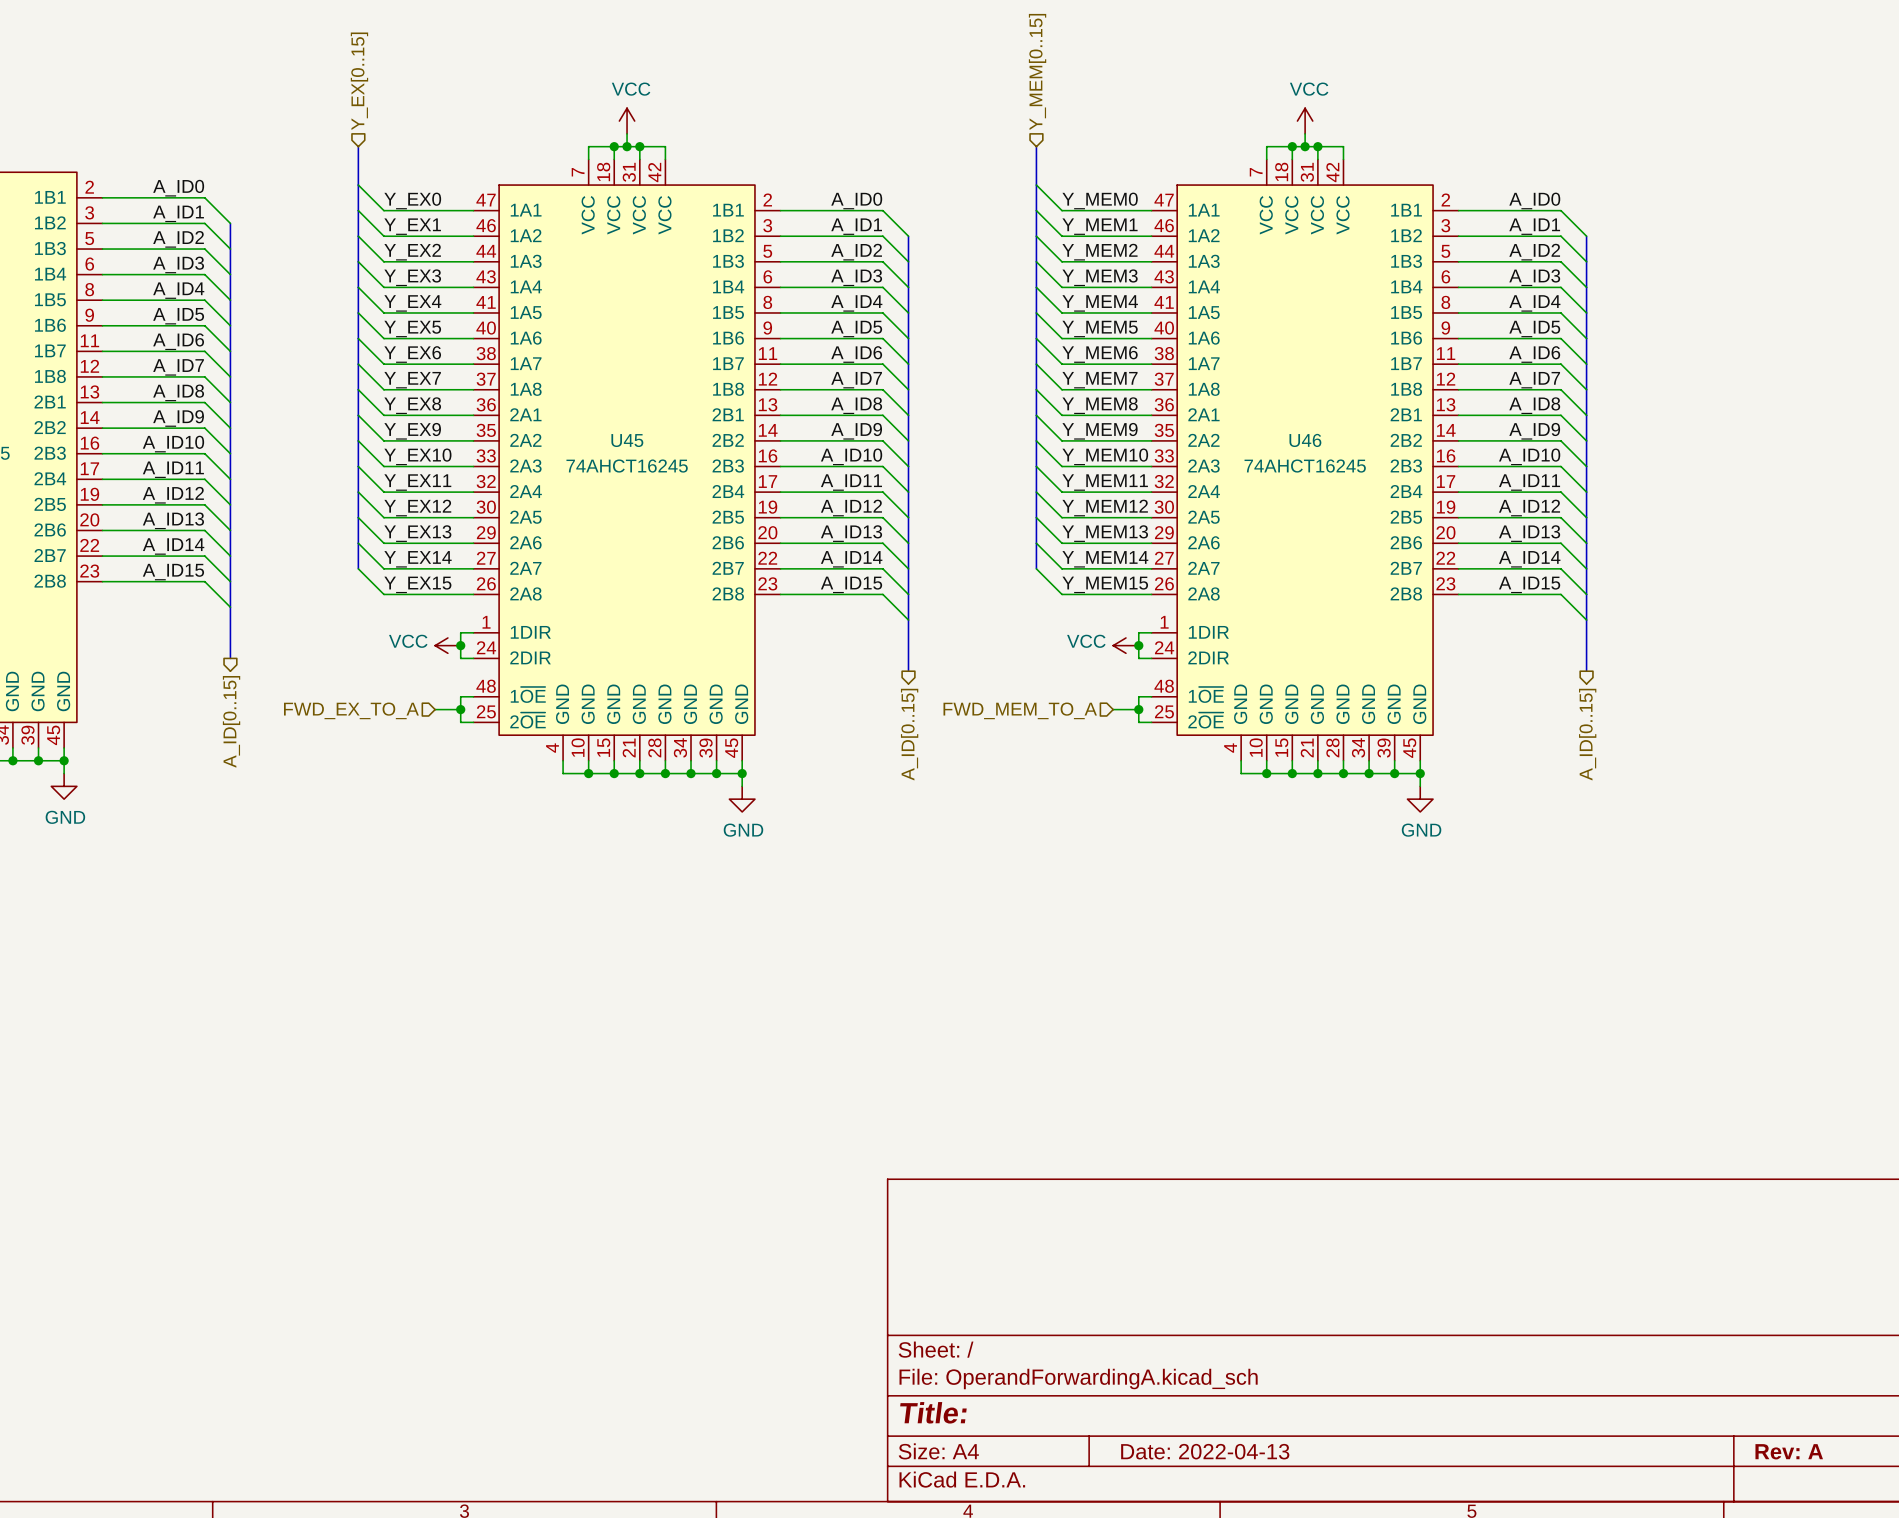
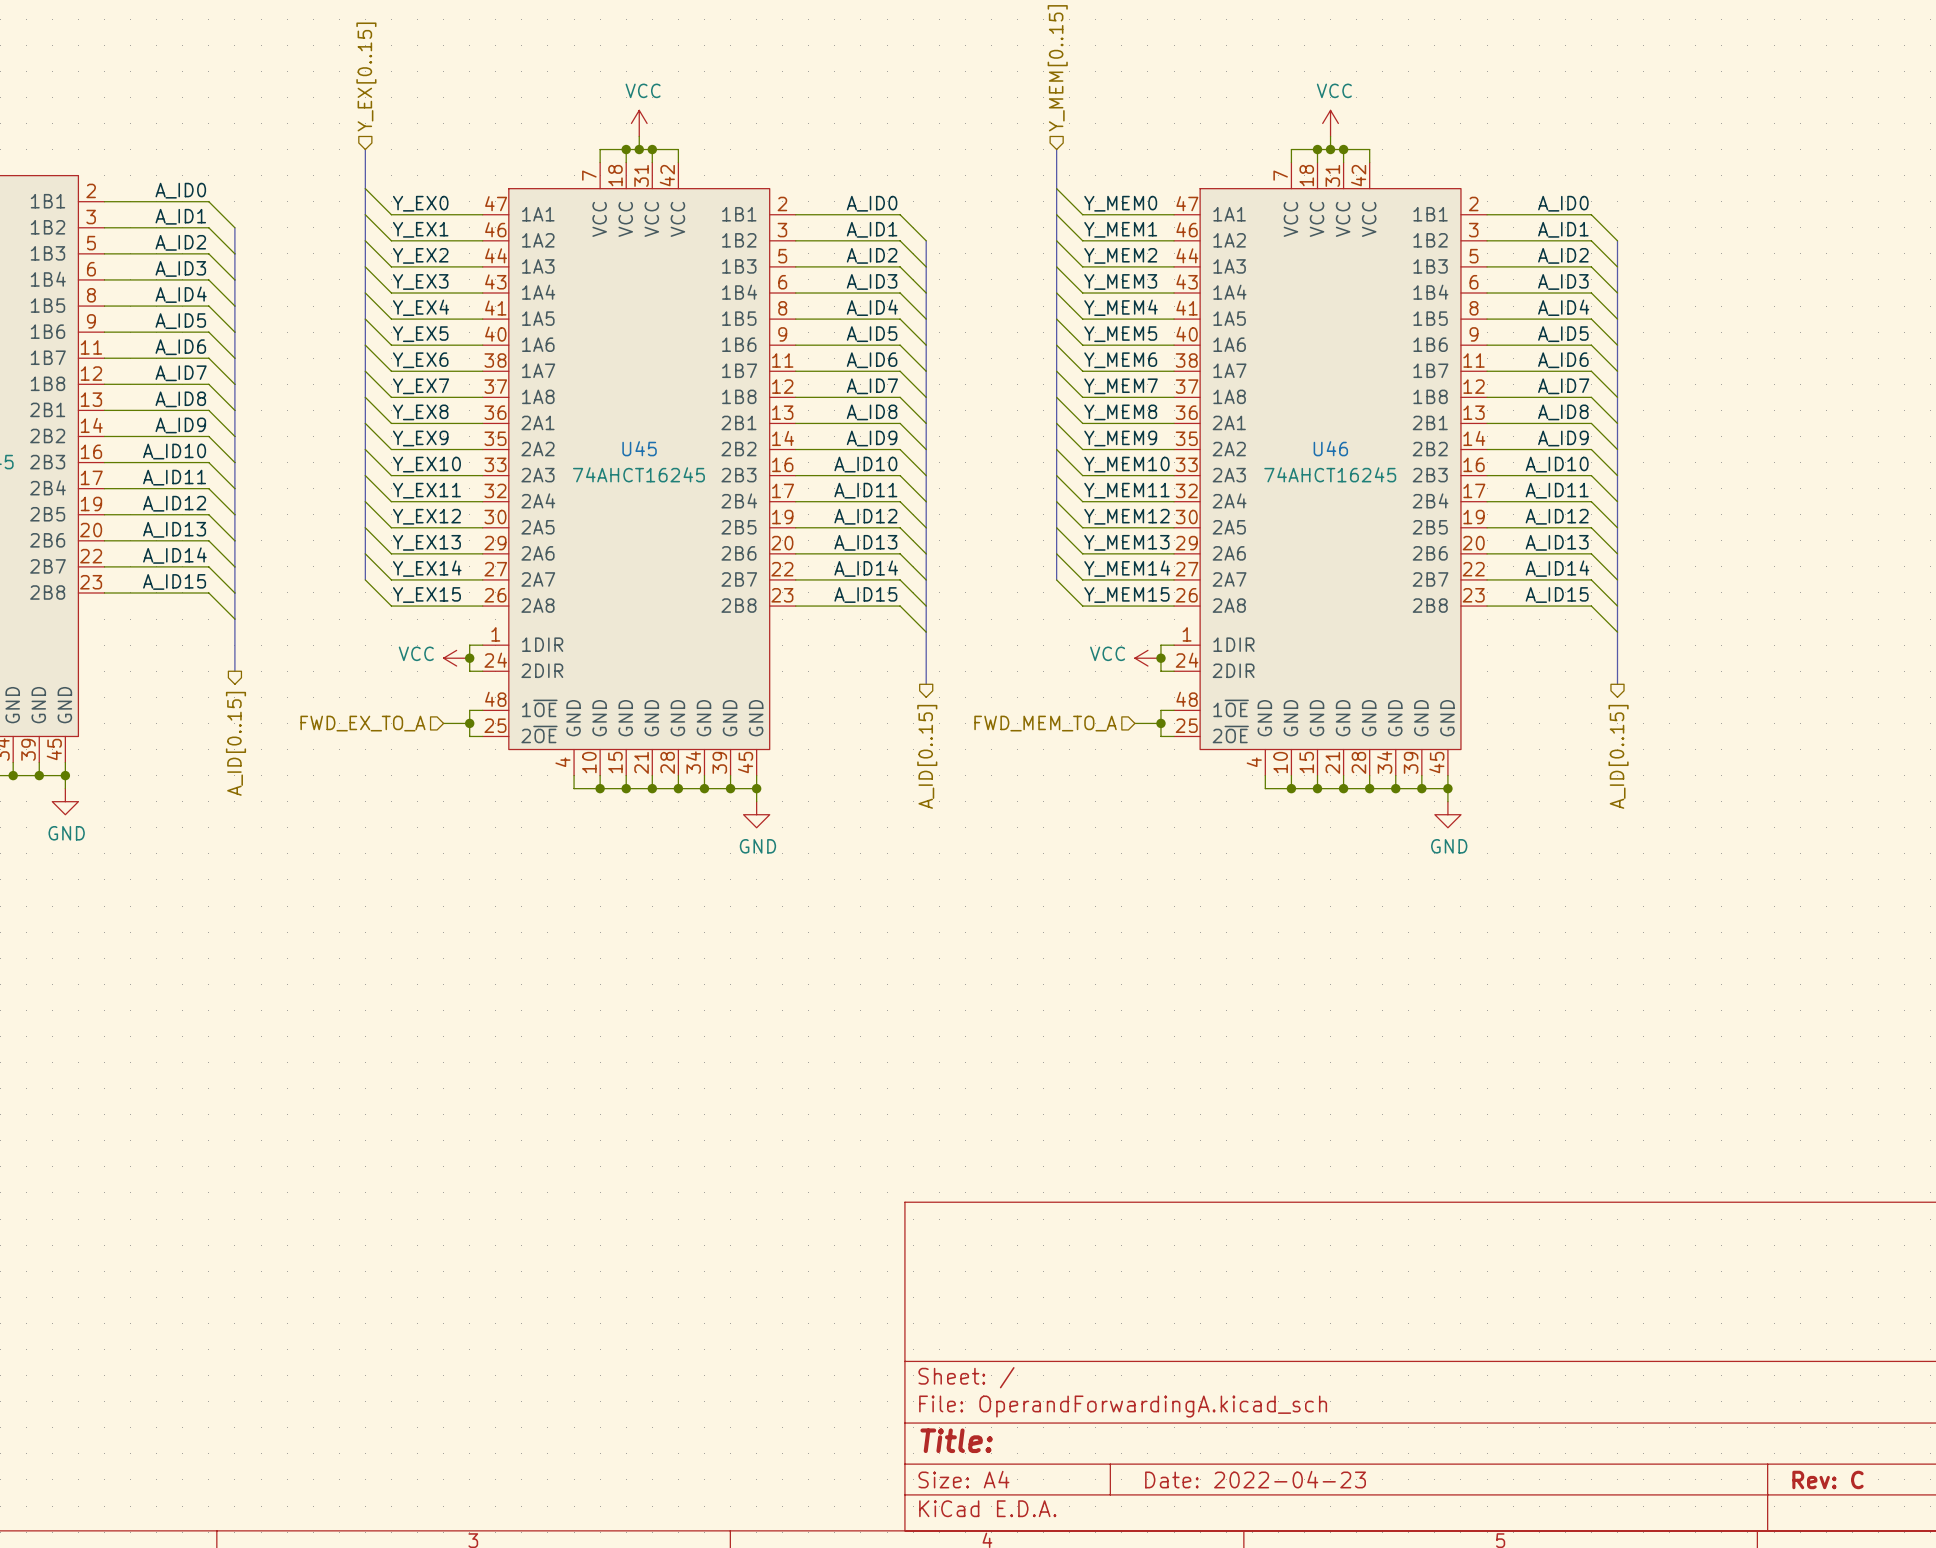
title block: Date: 2022-04-13 (1205, 1451) -> Date: 2022-04-23 (1255, 1479)
title block: Rev: A (1789, 1451) -> Rev: C (1827, 1479)

